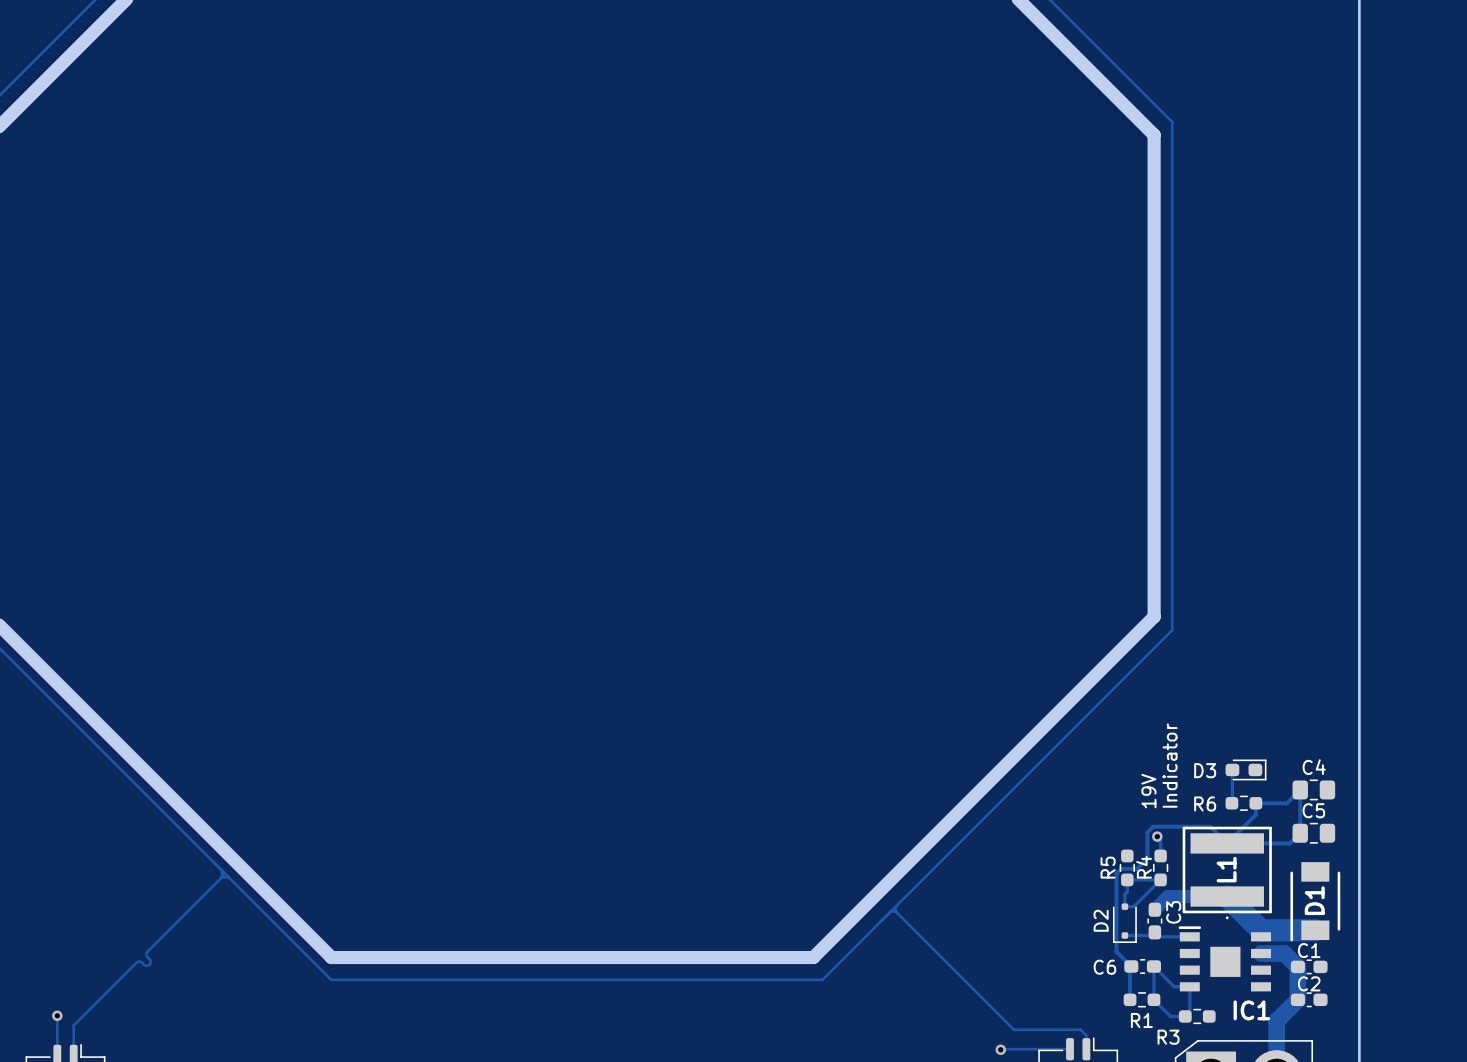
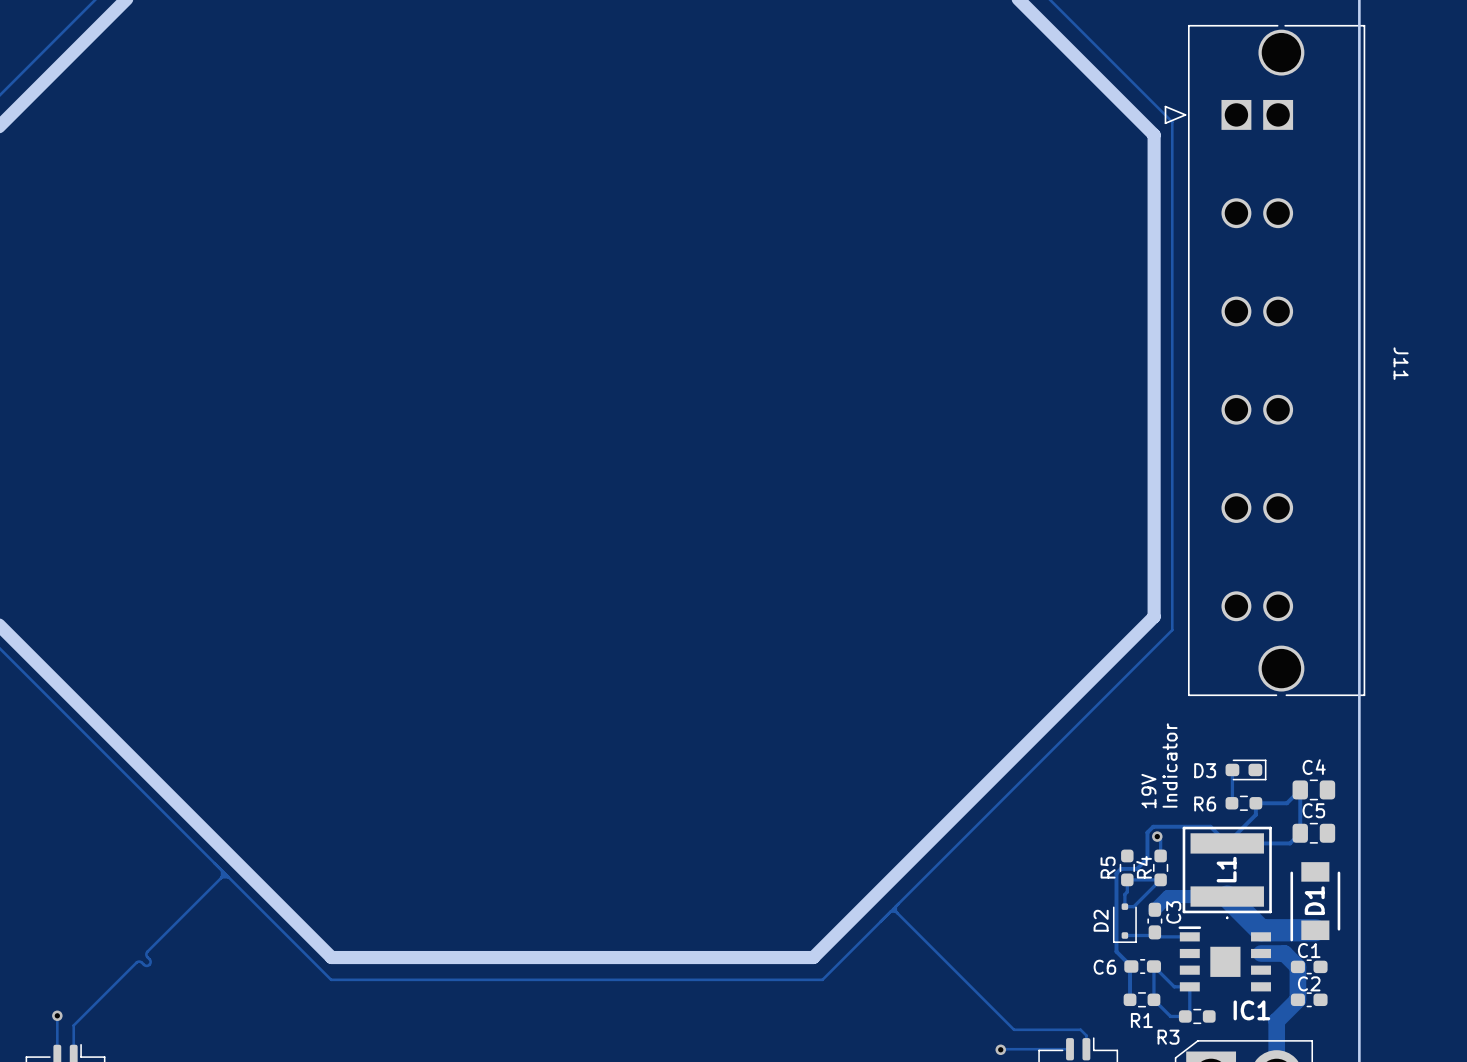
J11: none -> (1264, 360)

